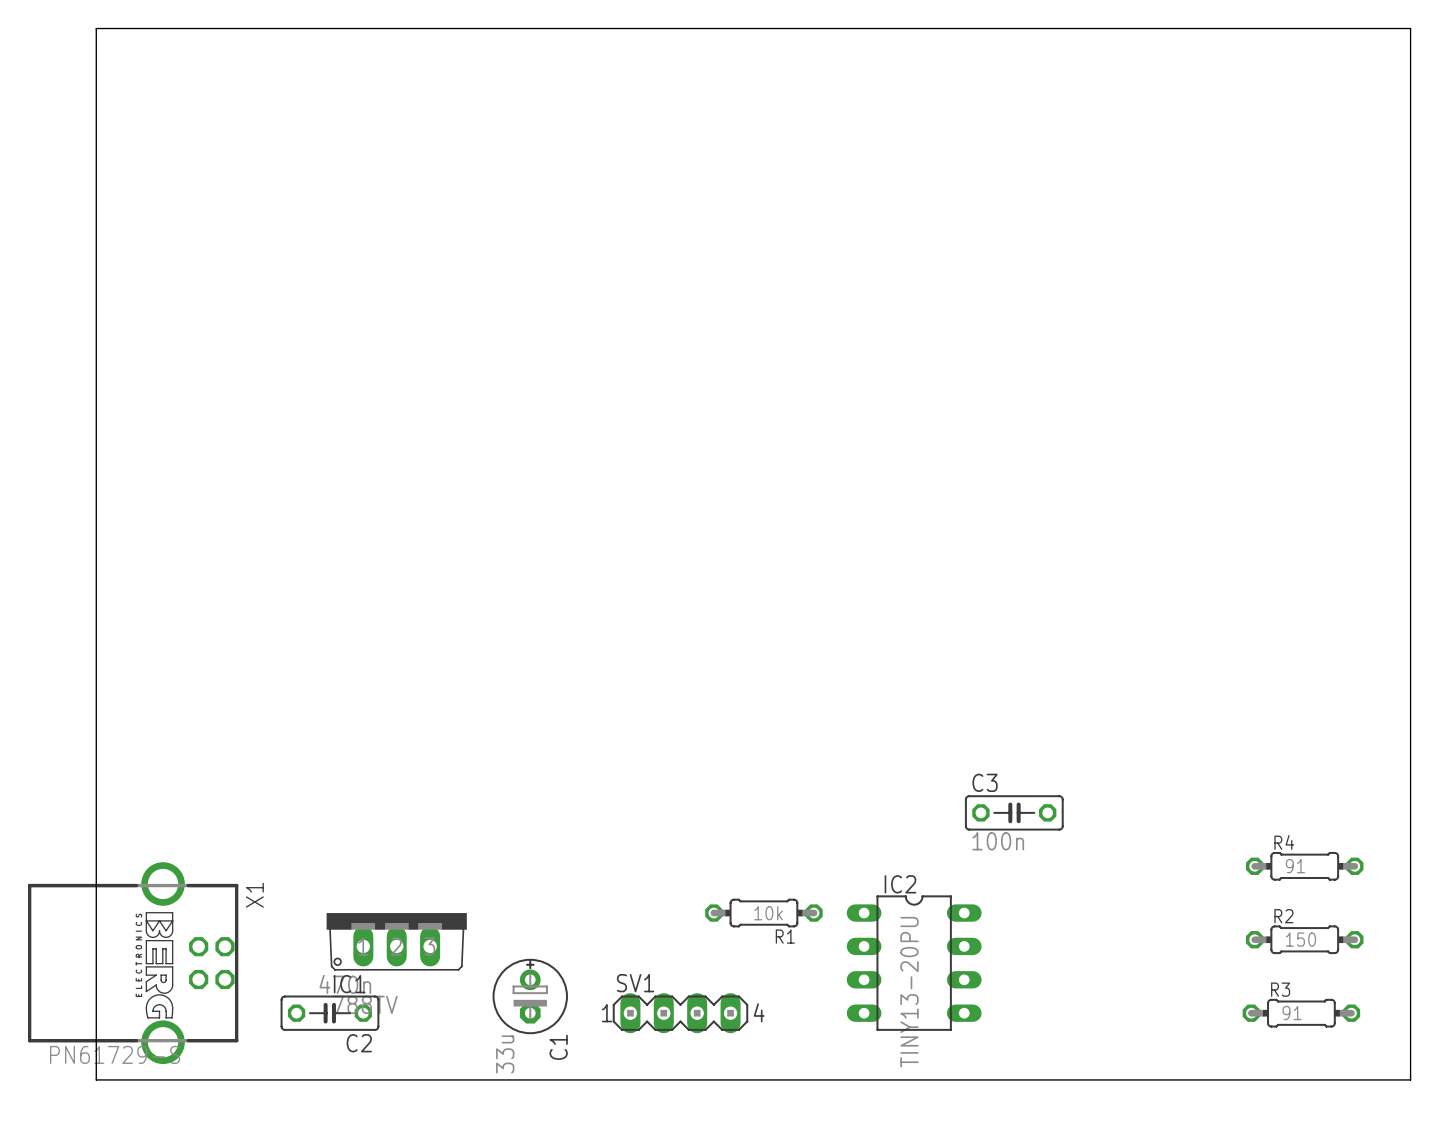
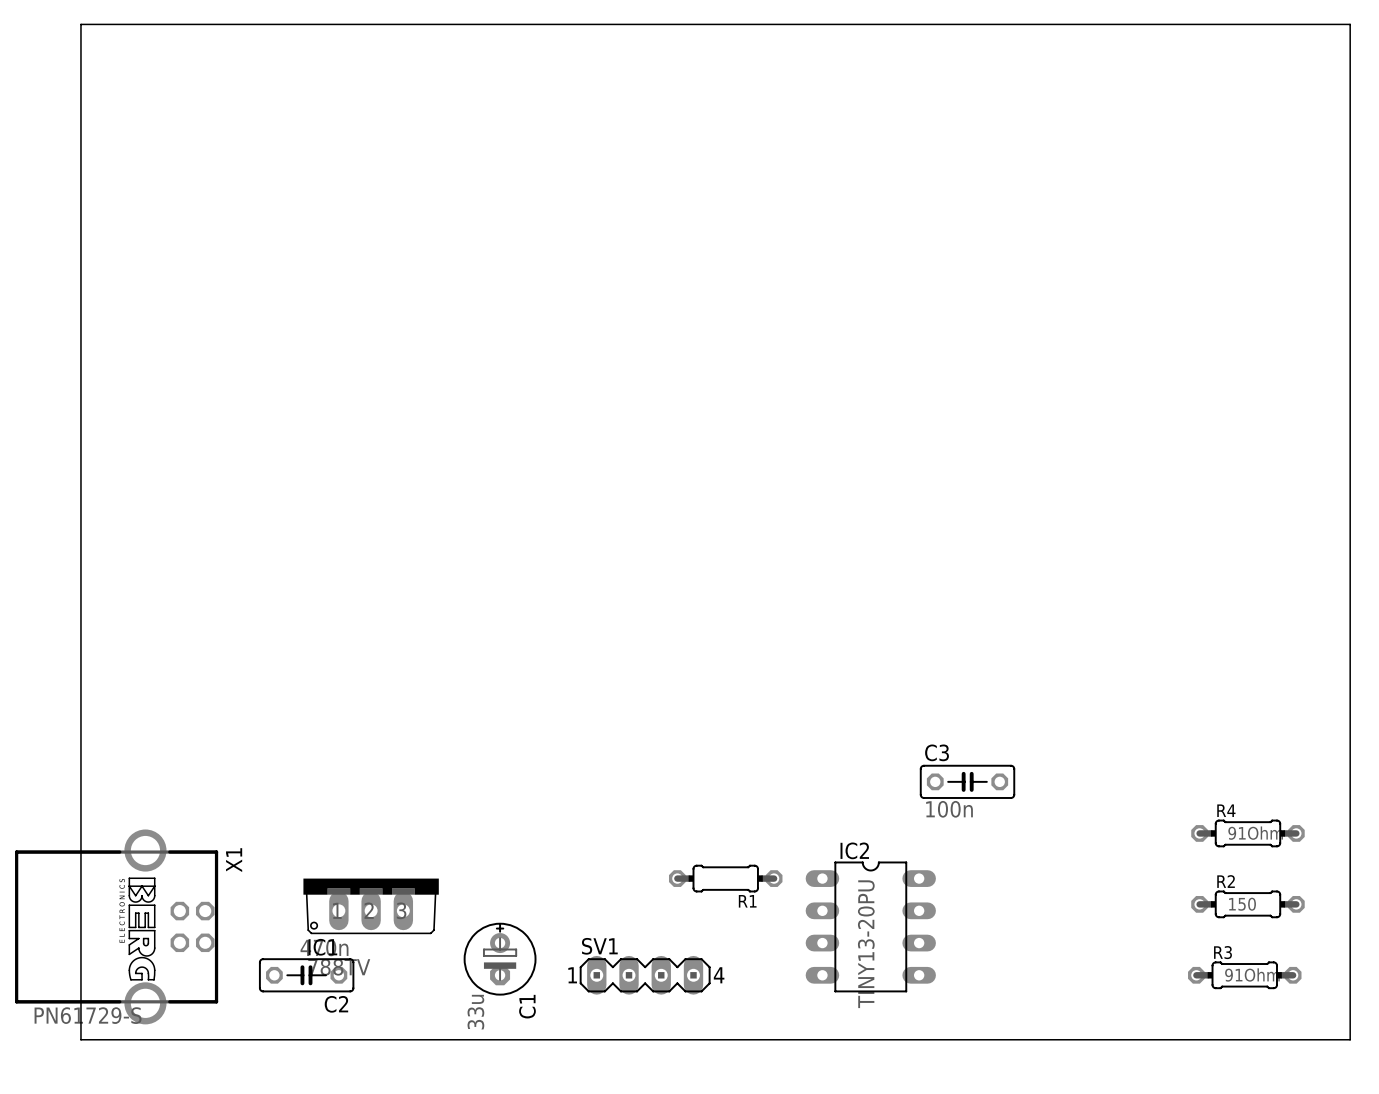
R4 value: 91 (1295, 866) -> 91Ohm (1255, 833)
R1 value: 10k (768, 913) -> none
R3 value: 91 (1292, 1013) -> 91Ohm (1252, 974)

